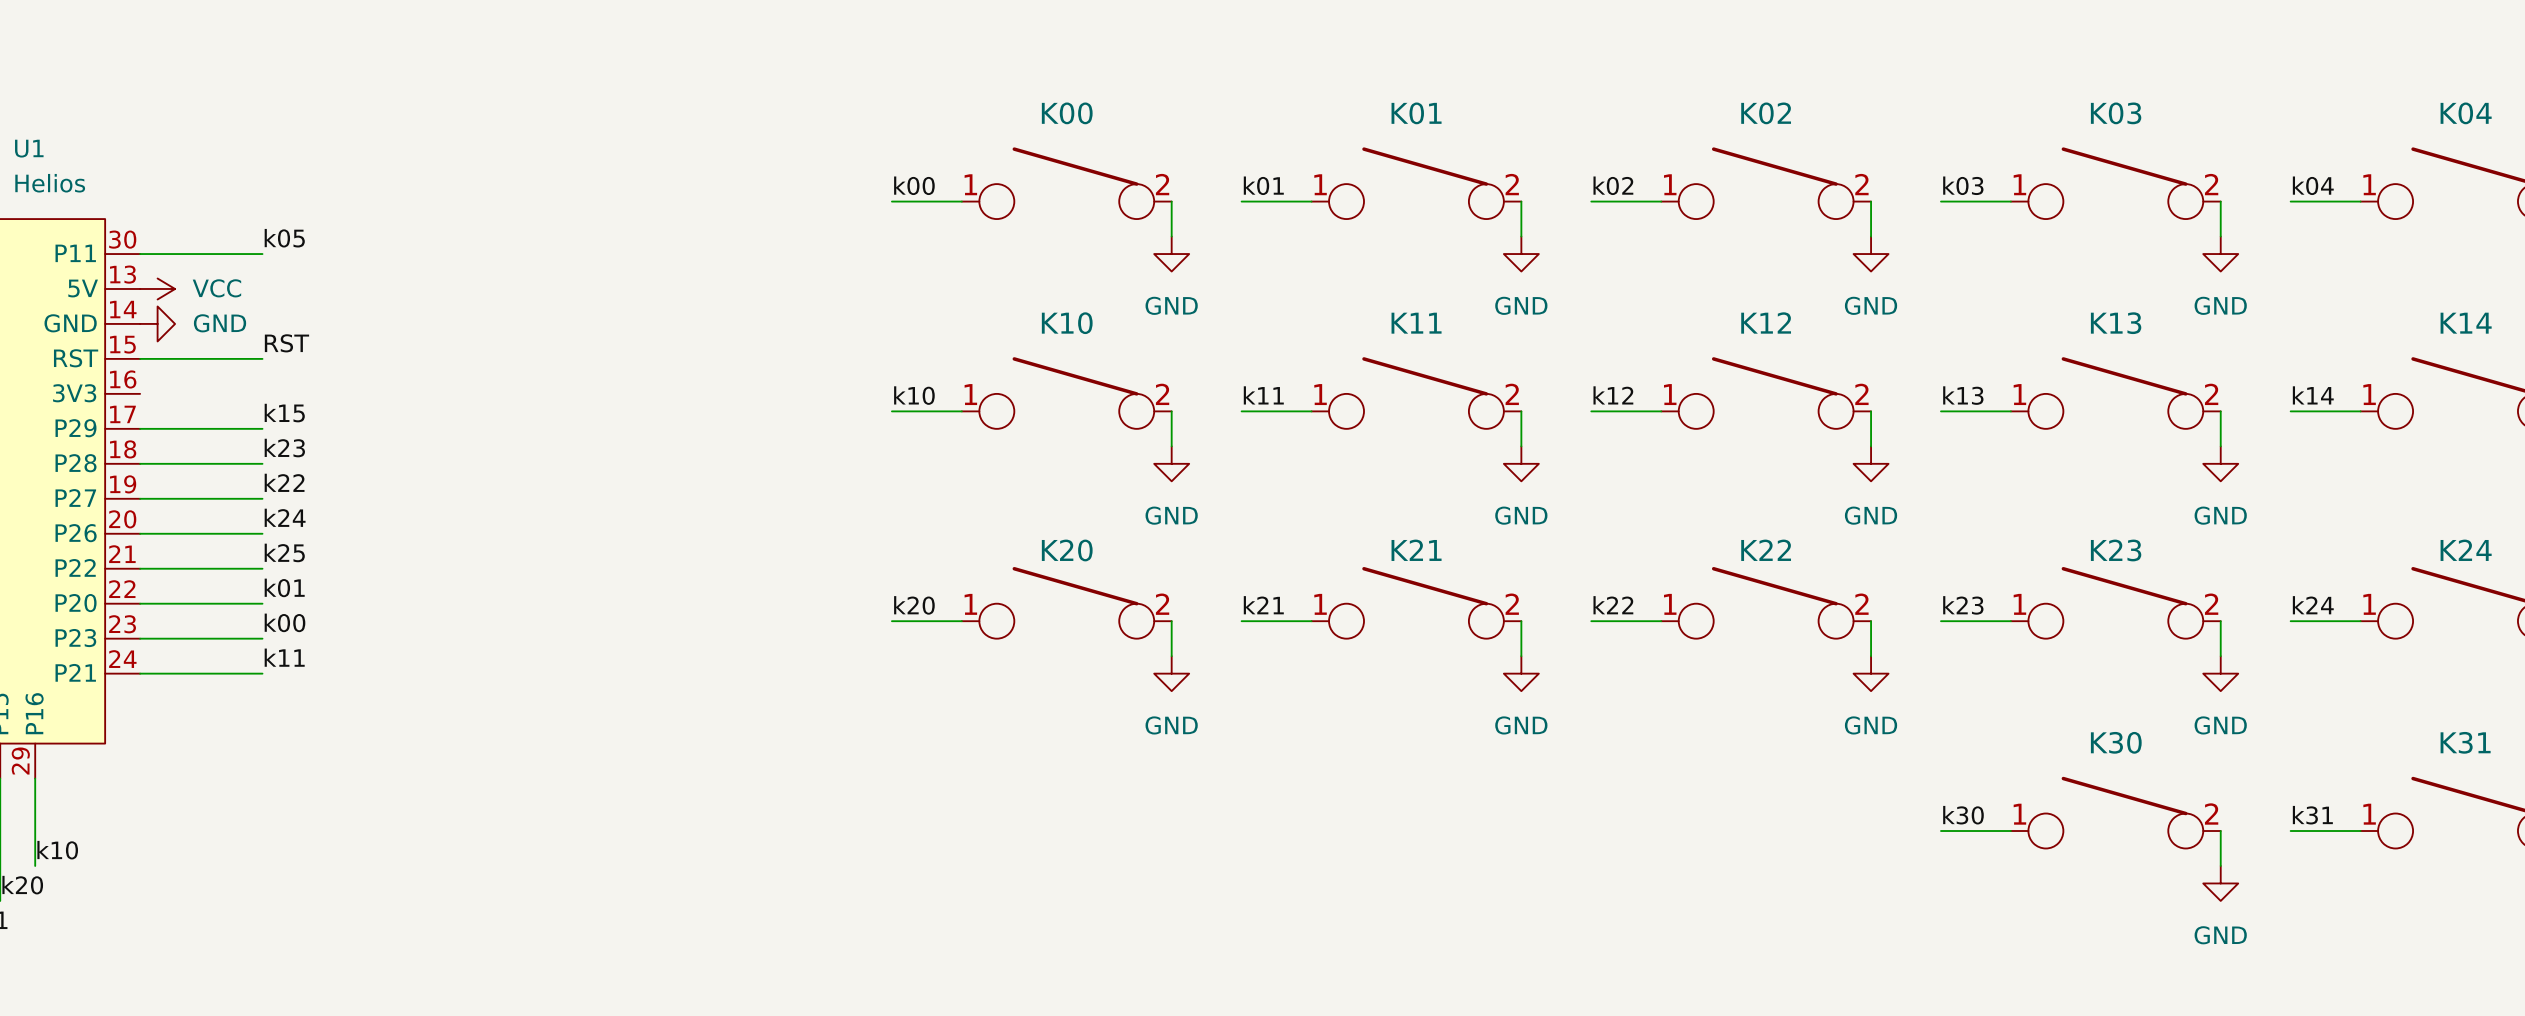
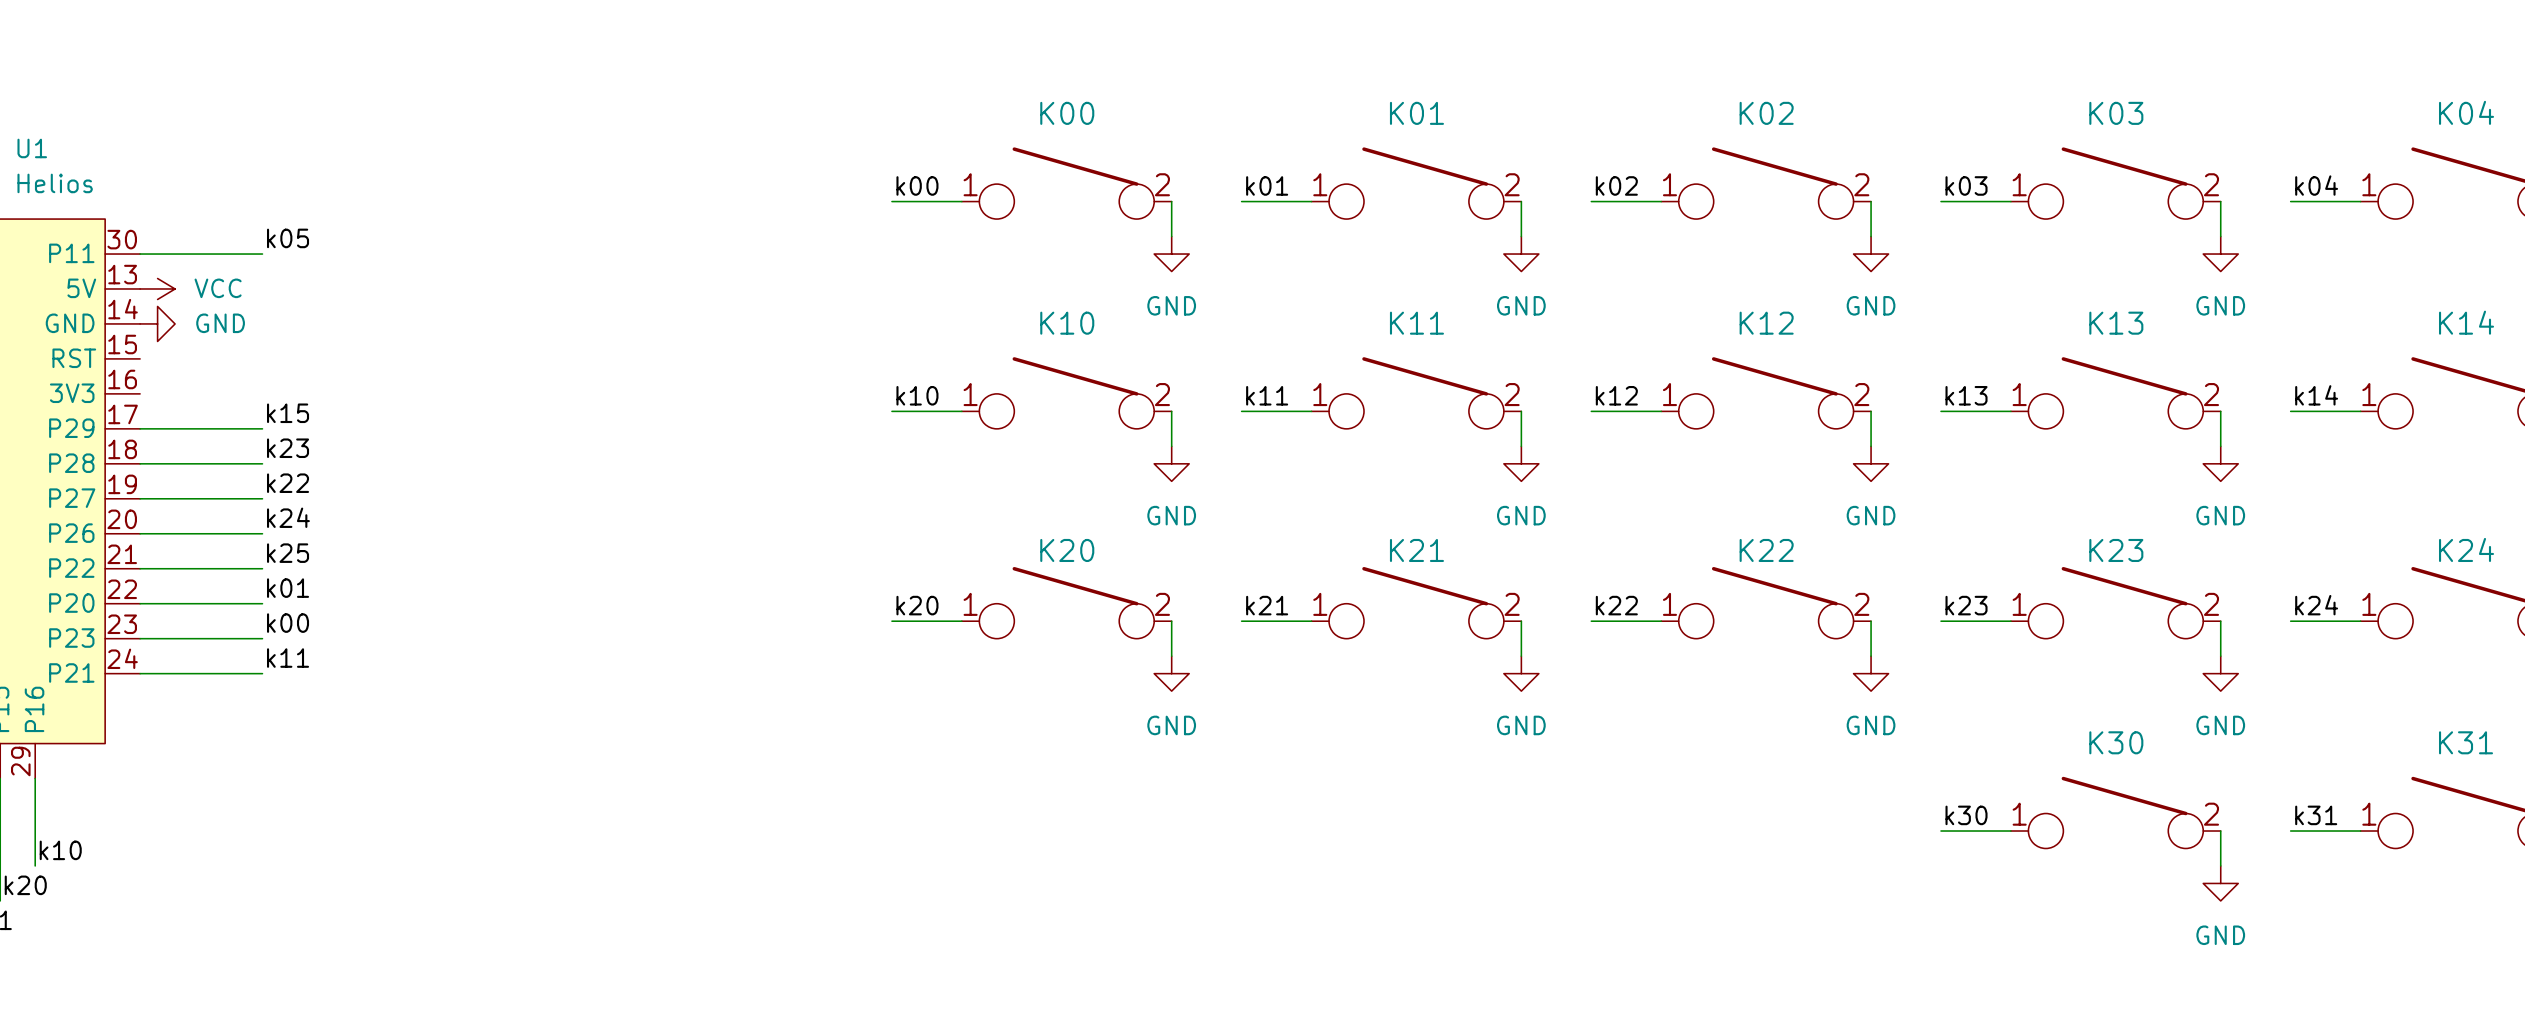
label: RST (286, 343) -> none
wire: (140, 358) (262, 358) -> none

